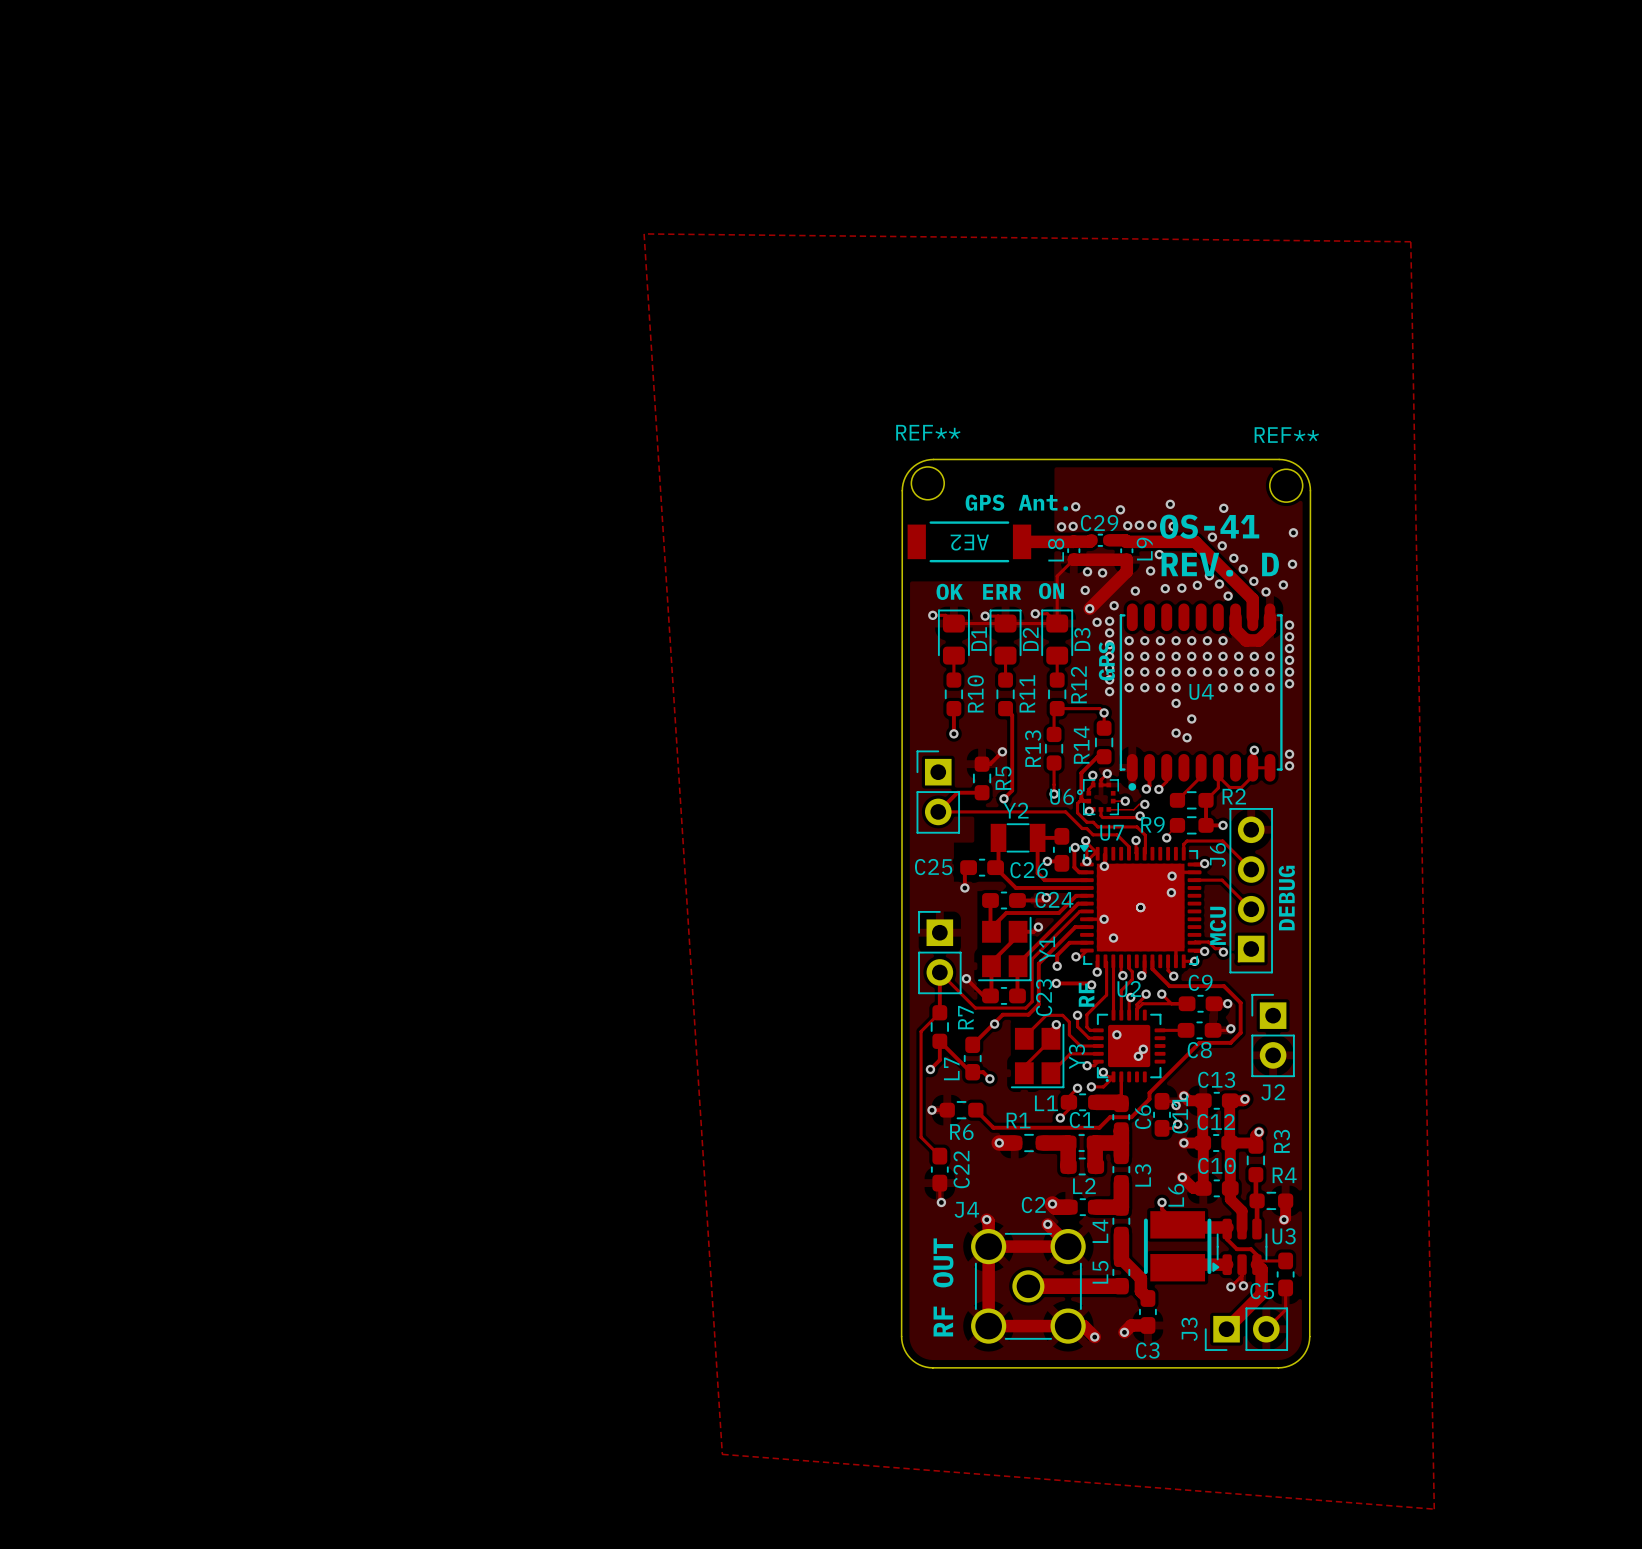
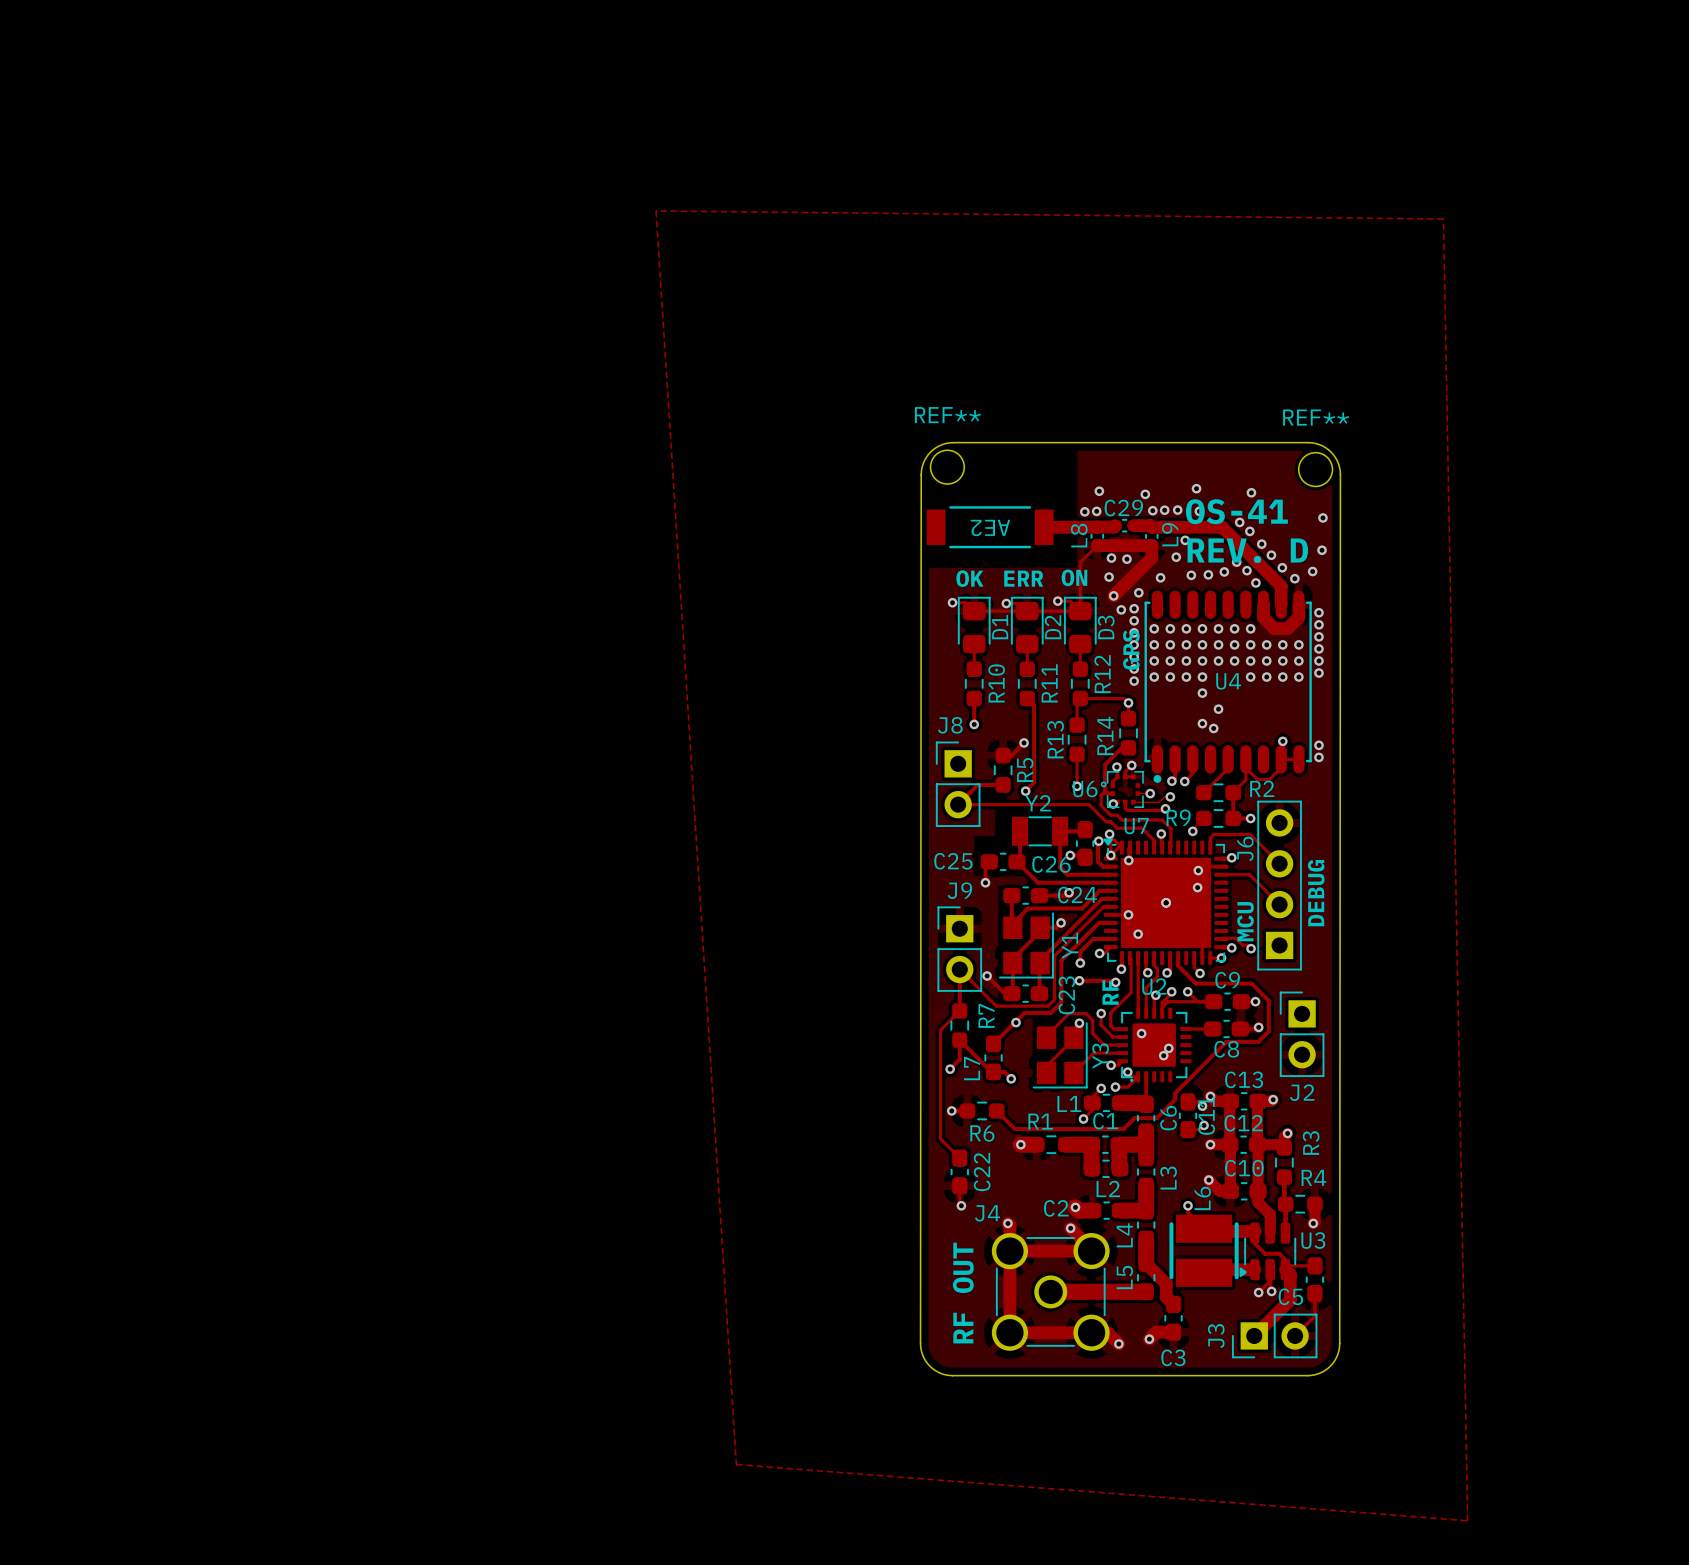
text: GPS Ant. (1016, 502) -> none
J8 name: none -> J8 (950, 725)
J9 name: none -> J9 (959, 890)

